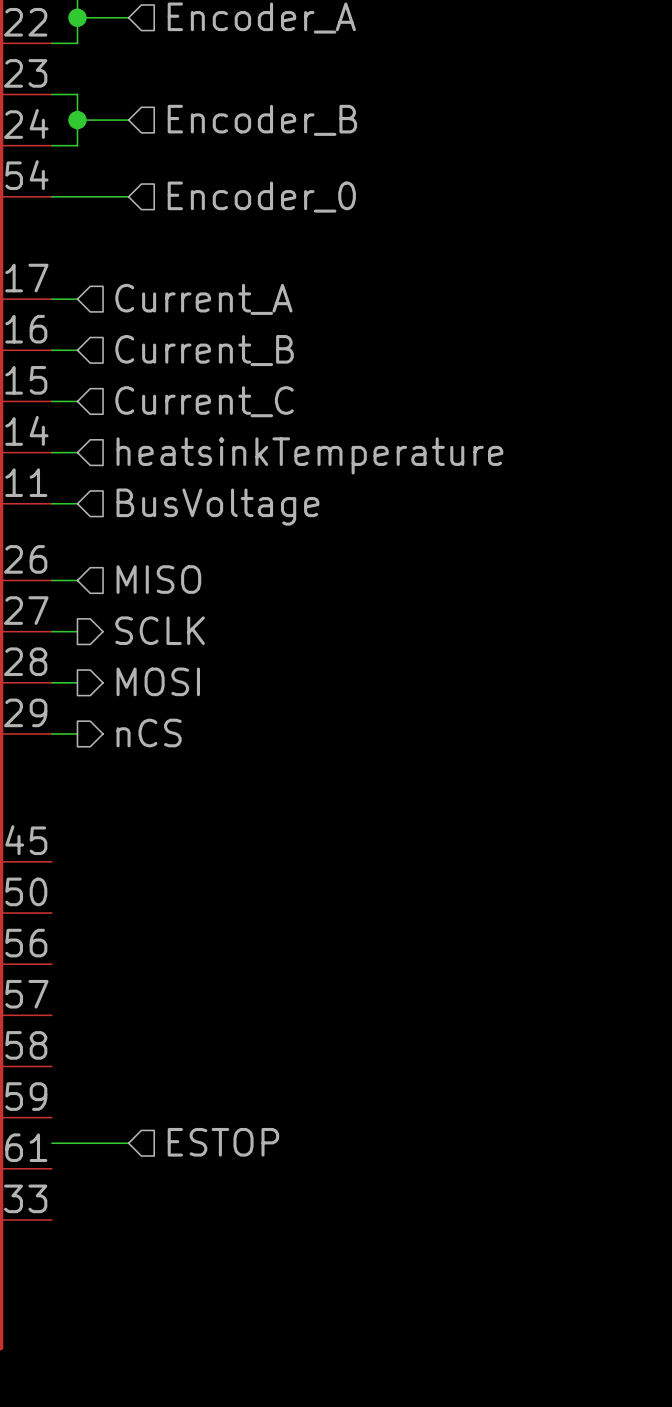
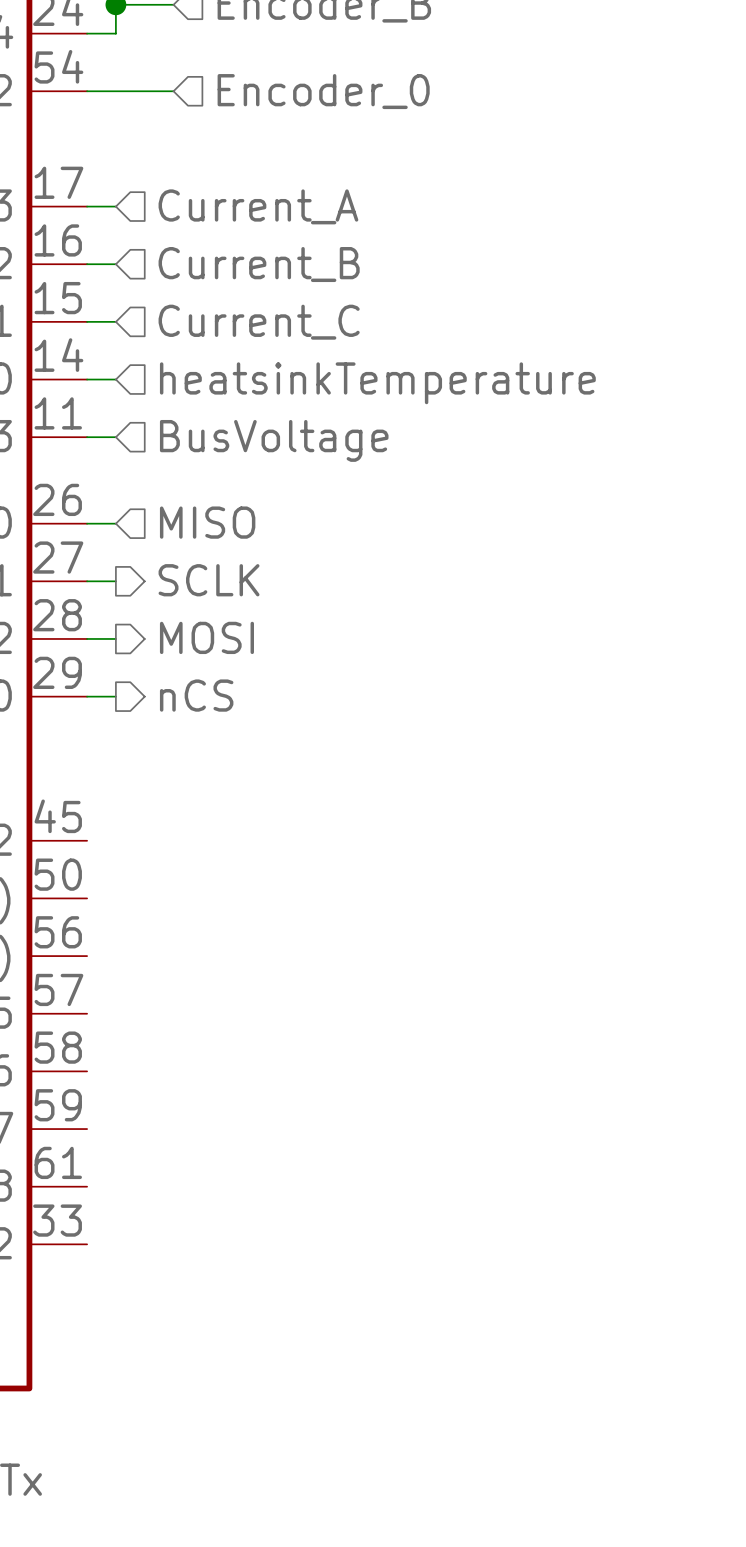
hierarchical label: ESTOP (223, 1142) -> none
wire: (51, 1143) (128, 1143) -> none

